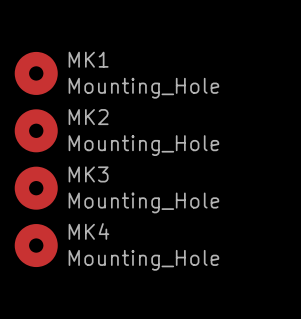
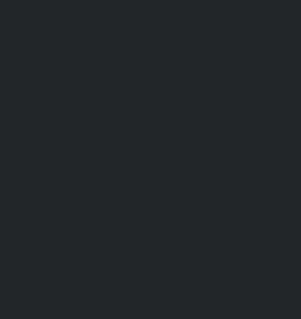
MK1: Mounting_Hole (36, 73) -> none
MK2: Mounting_Hole (36, 130) -> none
MK3: Mounting_Hole (36, 188) -> none
MK4: Mounting_Hole (36, 245) -> none

